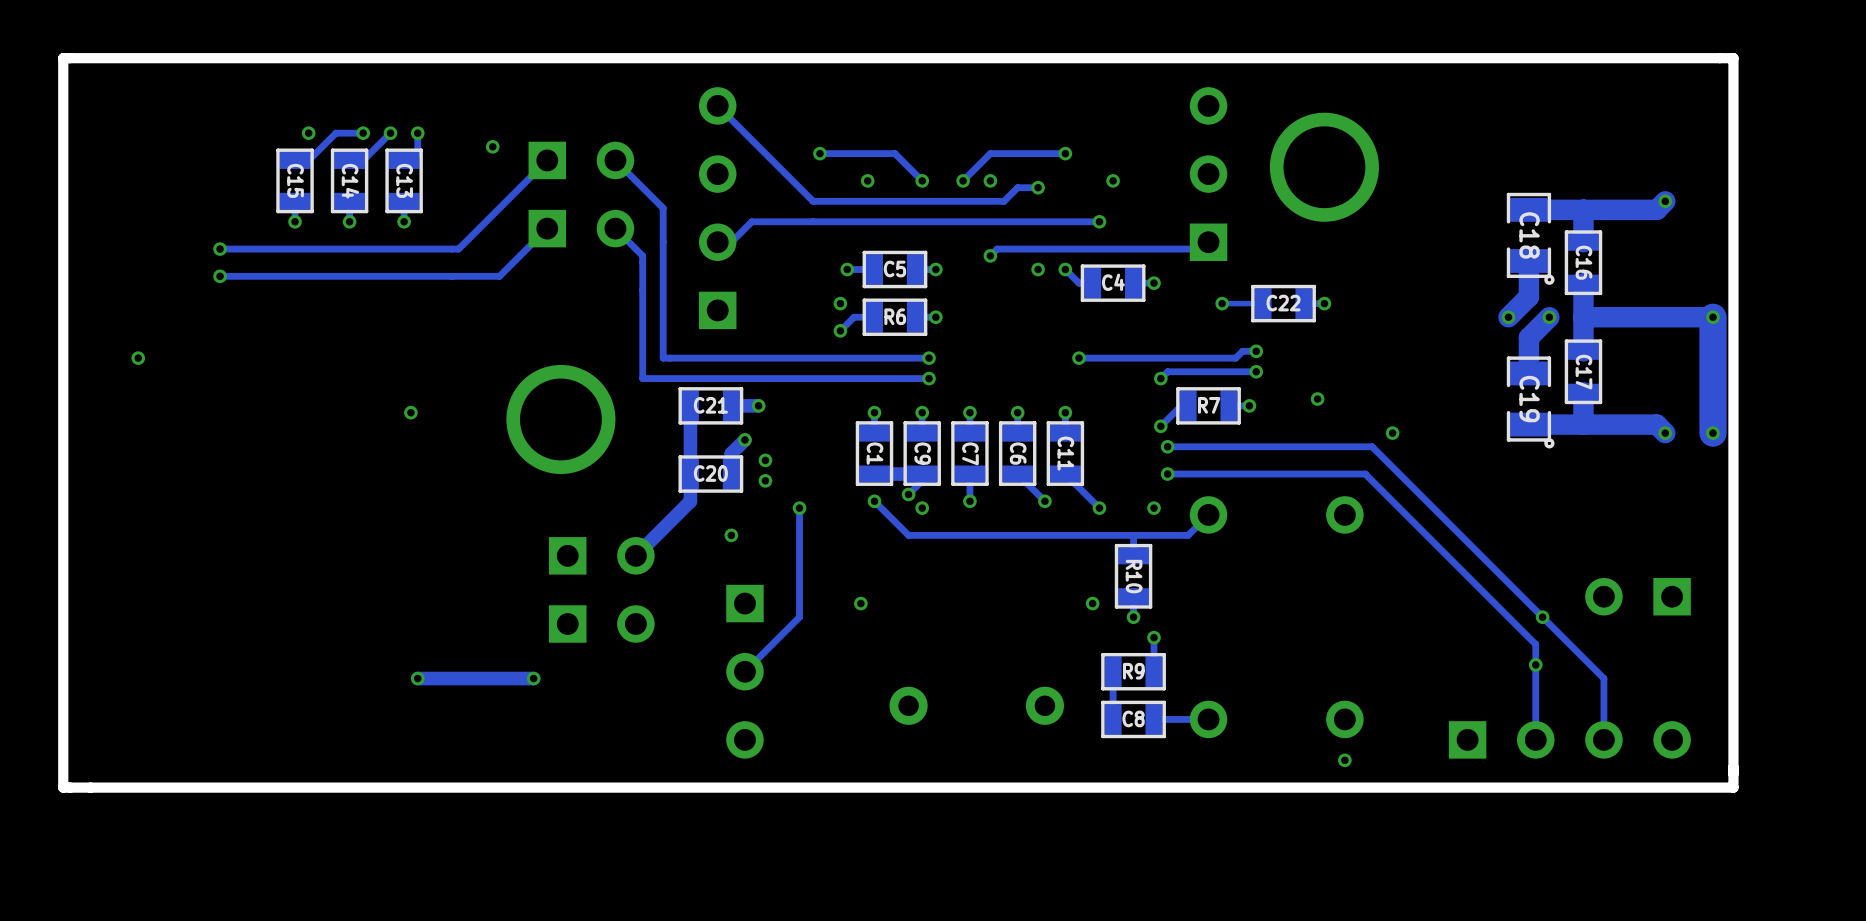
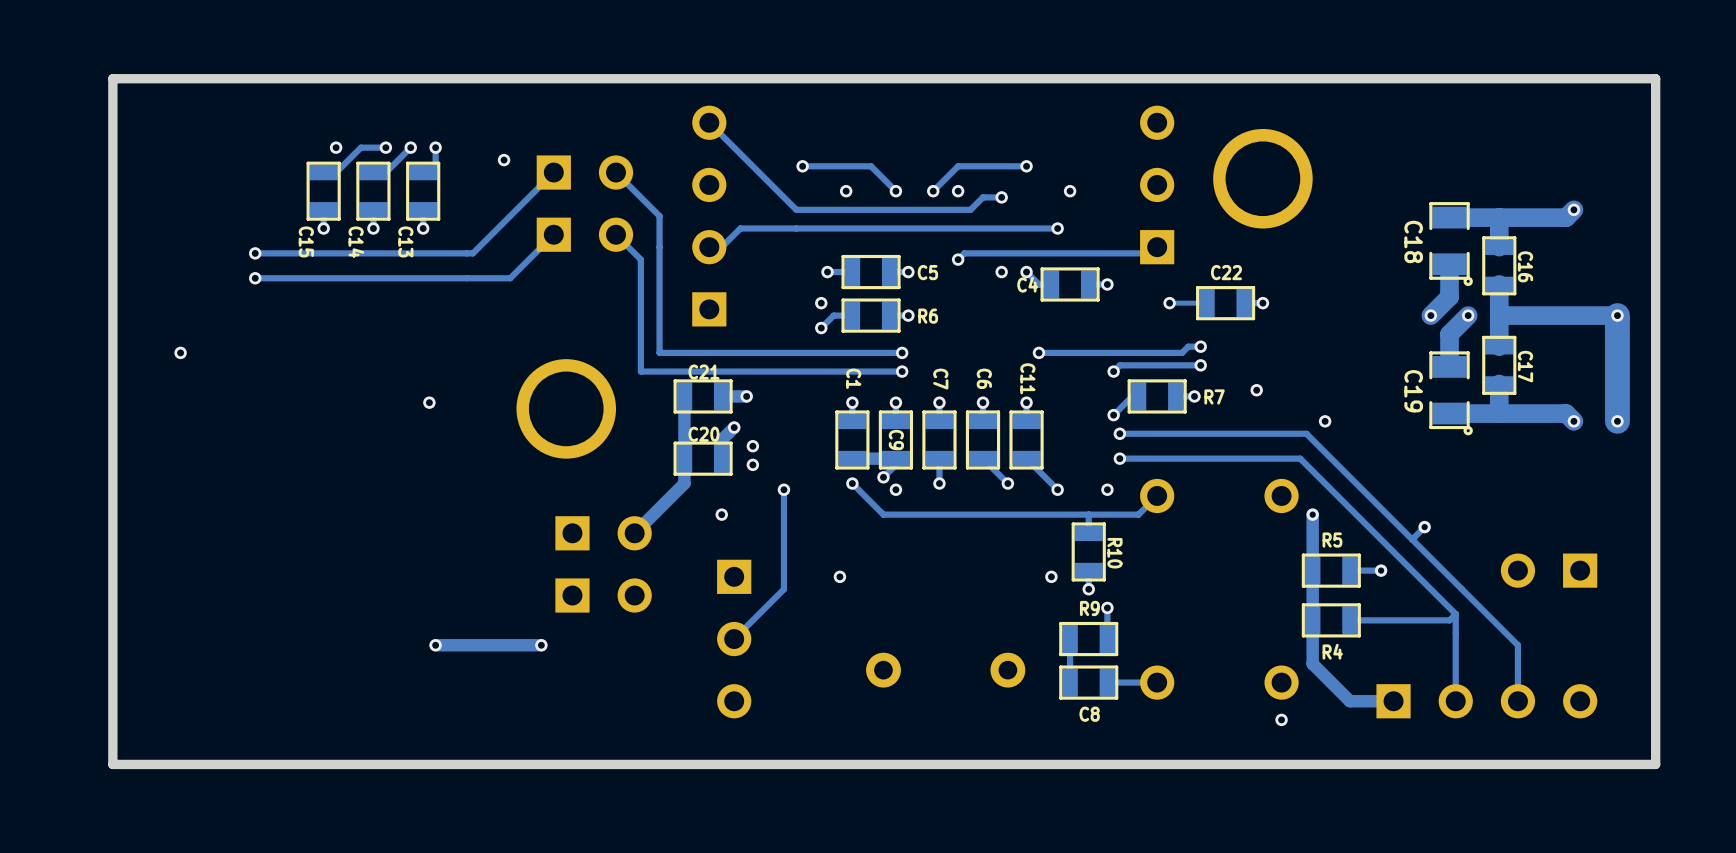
board edge: (1733, 58) (63, 58) (63, 787) (1733, 787) (1733, 58) -> (1655, 78) (1655, 764) (112, 764) (112, 78) (1655, 78)
C15 name position: C15 (295, 180) -> C15 (306, 241)
C13 name position: C13 (404, 180) -> C13 (405, 241)
C14 name position: C14 (350, 181) -> C14 (356, 242)
C18 name position: C18 (1529, 235) -> C18 (1413, 241)
C16 name position: C16 (1583, 262) -> C16 (1525, 266)
C5 name position: C5 (894, 269) -> C5 (927, 272)
C4 name position: C4 (1113, 282) -> C4 (1027, 284)
C22 name position: C22 (1283, 303) -> C22 (1226, 272)
R6 name position: R6 (895, 316) -> R6 (928, 316)
C17 name position: C17 (1583, 372) -> C17 (1525, 366)
C19 name position: C19 (1529, 399) -> C19 (1413, 391)
C21 name position: C21 (710, 405) -> C21 (703, 372)
R7 name position: R7 (1209, 405) -> R7 (1214, 396)
C1 name position: C1 (875, 453) -> C1 (853, 378)
C7 name position: C7 (970, 453) -> C7 (940, 379)
C6 name position: C6 (1018, 453) -> C6 (984, 378)
C11 name position: C11 (1065, 453) -> C11 (1027, 378)
C20 name position: C20 (710, 473) -> C20 (703, 434)
track: none -> (1312, 514) (1312, 663) (1350, 701) (1393, 701)
via: none -> (1312, 514)
track: none -> (1424, 527) (1412, 539)
via: none -> (1424, 527)
R10 name position: R10 (1134, 576) -> R10 (1114, 553)
R5: none -> (1331, 570)
track: none -> (1381, 570) (1350, 570)
via: none -> (1381, 570)
via: (1542, 617) -> none
track: none -> (1455, 614) (1449, 620) (1350, 620)
R4: none -> (1331, 620)
via: (1535, 664) -> none
R9 name position: R9 (1133, 671) -> R9 (1089, 608)
C8 name position: C8 (1133, 718) -> C8 (1089, 714)

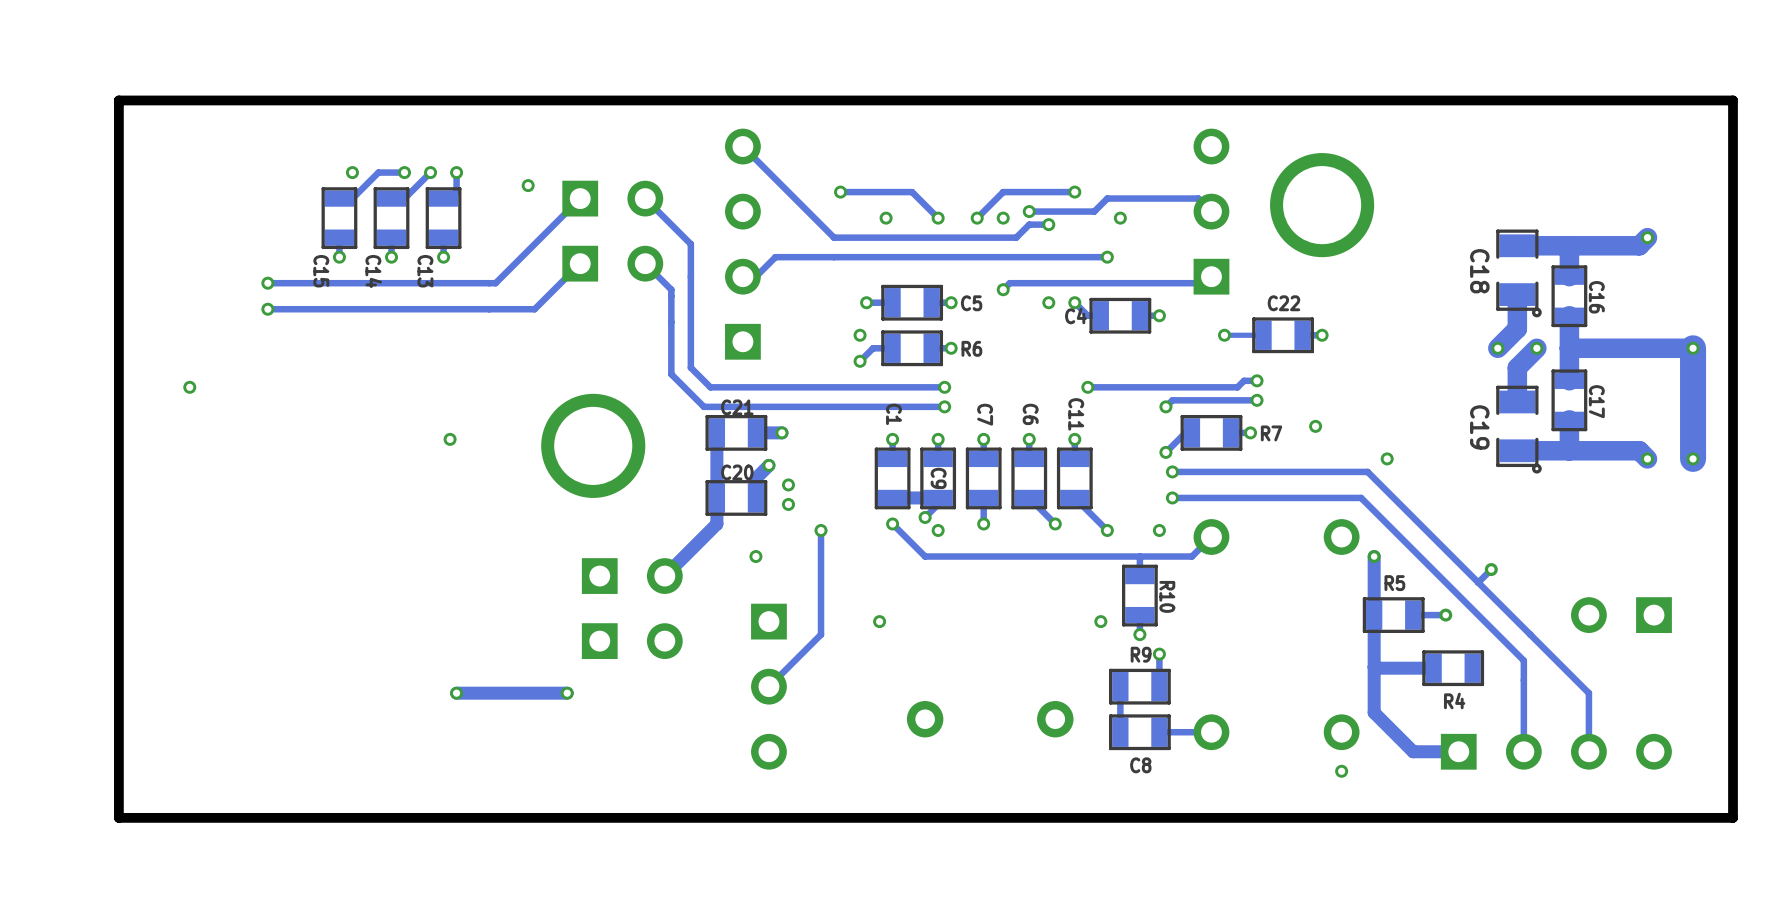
track: none -> (1029, 211) (1094, 211) (1107, 198) (1198, 198) (1211, 211)
via: none -> (1029, 211)
track: (659, 334) (659, 352) (678, 352) -> (690, 367) (710, 387)
track: (640, 340) (640, 371) (672, 371) -> (671, 374) (703, 406)
track: (1455, 614) (1449, 620) (1350, 620) -> none
track: none -> (1374, 667) (1433, 668)
R4 position: (1331, 620) -> (1453, 668)

